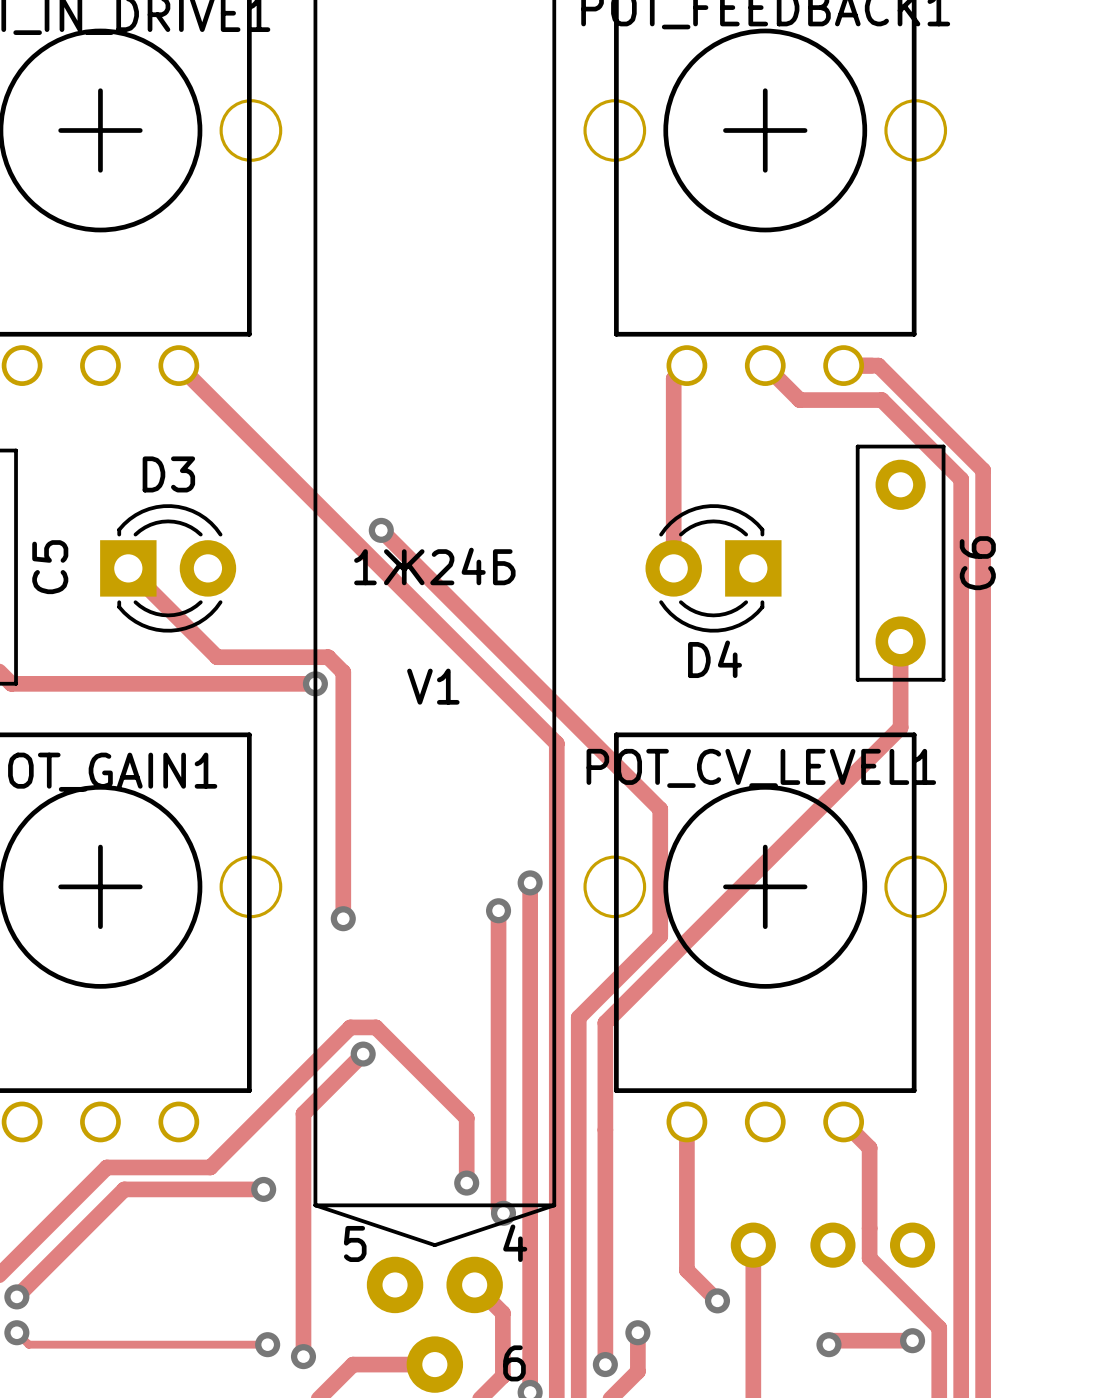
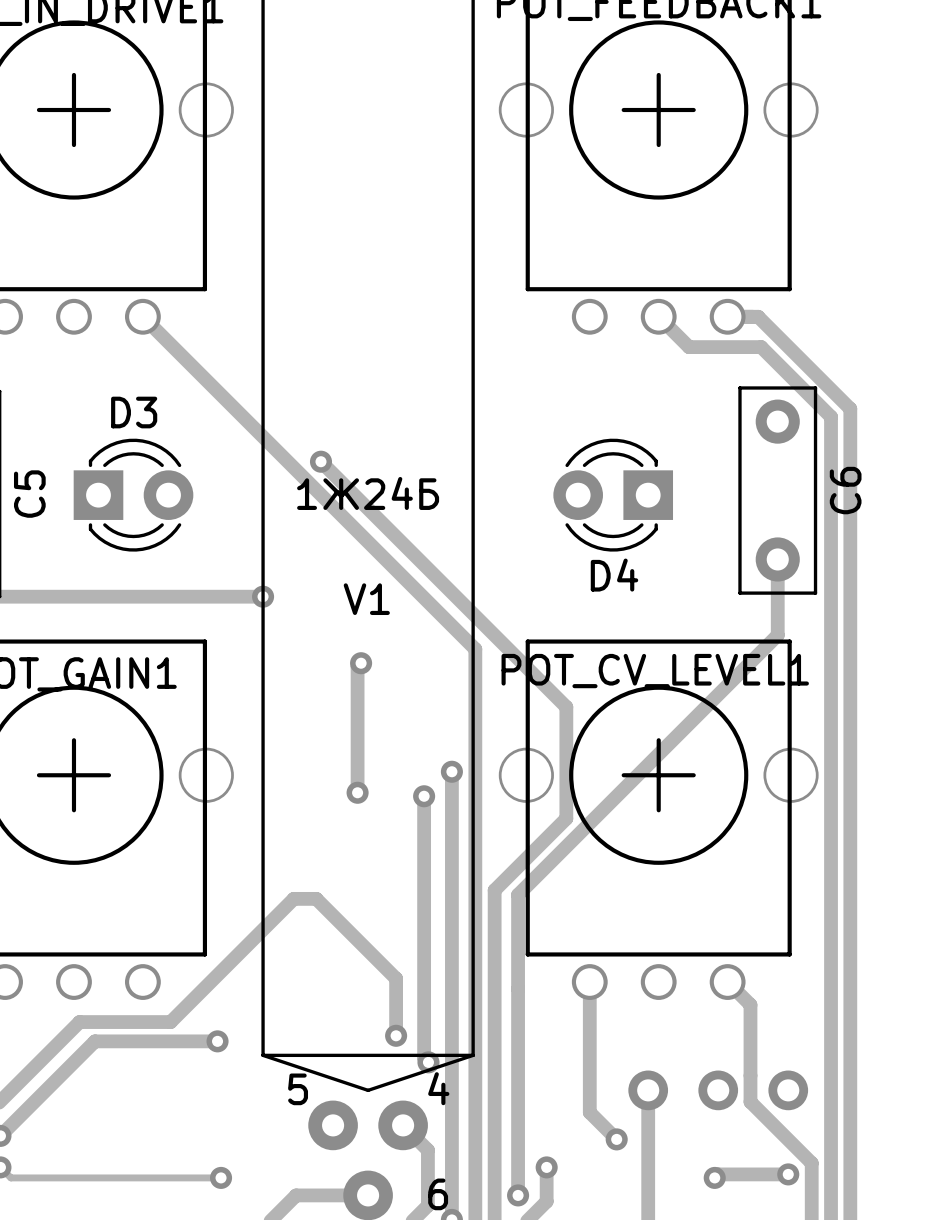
track: (686, 365) (673, 378) (673, 568) -> none
track: (128, 568) (217, 657) (328, 657) (343, 672) (343, 918) -> none
track: none -> (361, 663) (357, 666) (357, 792)
via: none -> (361, 663)
via: none -> (357, 792)
via: (343, 918) -> none
track: (363, 1054) (303, 1113) (303, 1356) -> none
via: (363, 1054) -> none
via: (303, 1356) -> none

